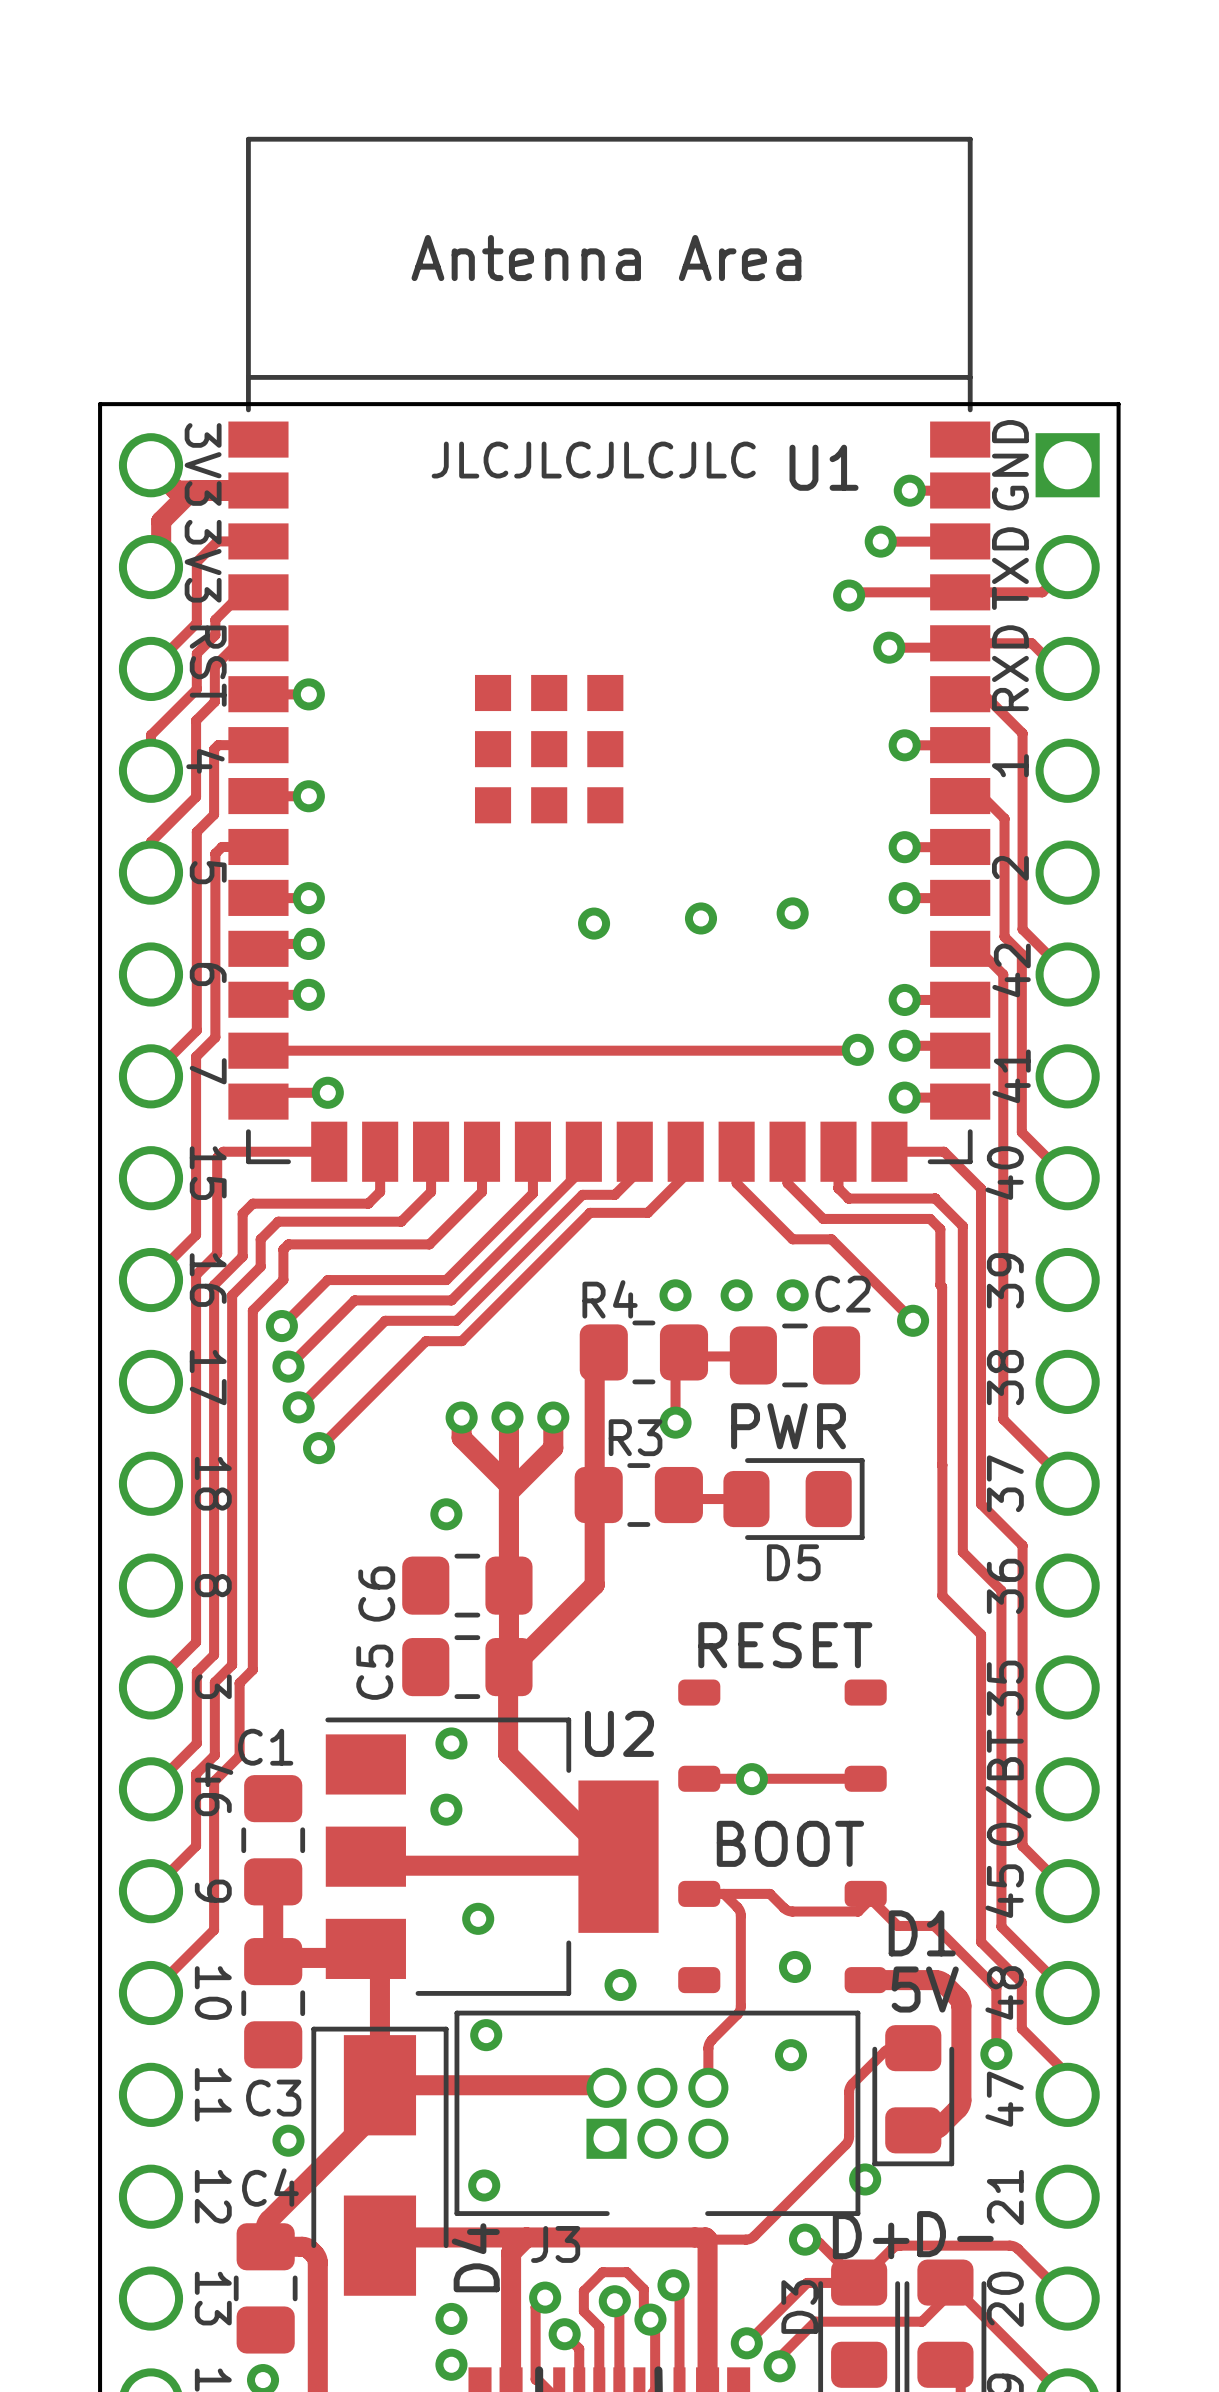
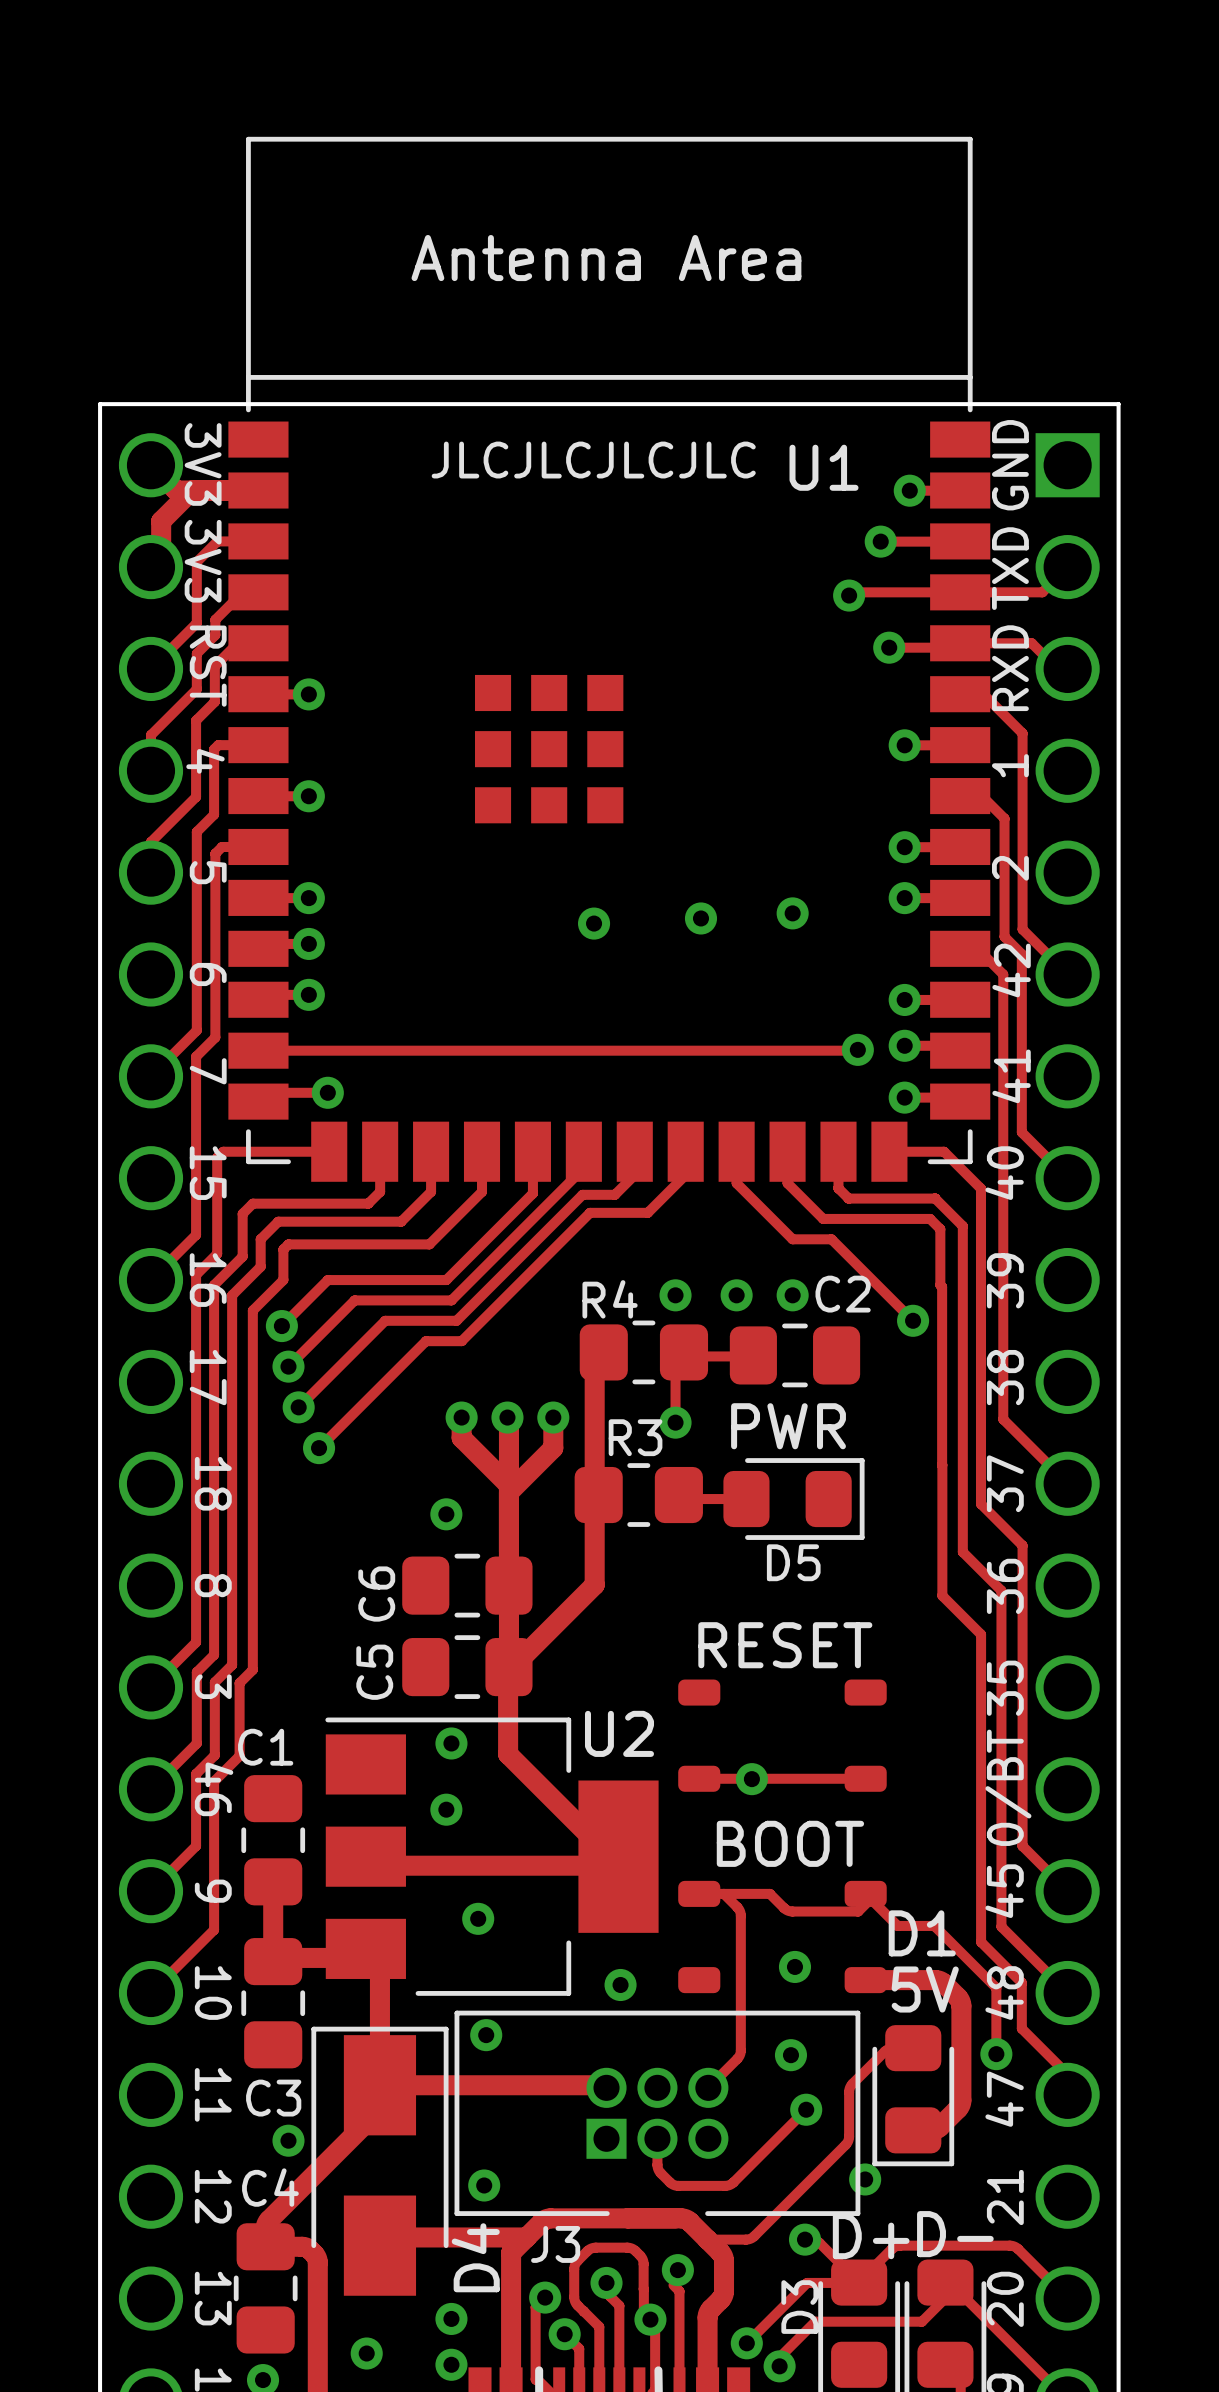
track: (740, 2006) (738, 2013) (709, 2043) (708, 2087) -> (740, 2006) (739, 2054) (708, 2087)
track: none -> (806, 2109) (733, 2182) (727, 2185) (678, 2185) (671, 2183) (657, 2168) (657, 2138)
via: none -> (806, 2109)
track: (526, 2237) (705, 2237) (707, 2239) (707, 2317) -> (526, 2237) (542, 2221) (549, 2218) (685, 2219) (720, 2252) (723, 2258) (723, 2294) (709, 2310) (707, 2317)
via position: (673, 2285) -> (677, 2270)
track: (643, 2288) (626, 2272) (602, 2272) (583, 2291) (584, 2311) -> (643, 2288) (643, 2261) (634, 2250) (627, 2247) (591, 2248) (576, 2261) (574, 2268) (574, 2299) (583, 2311)
via position: (614, 2301) -> (606, 2282)
via: none -> (366, 2353)

